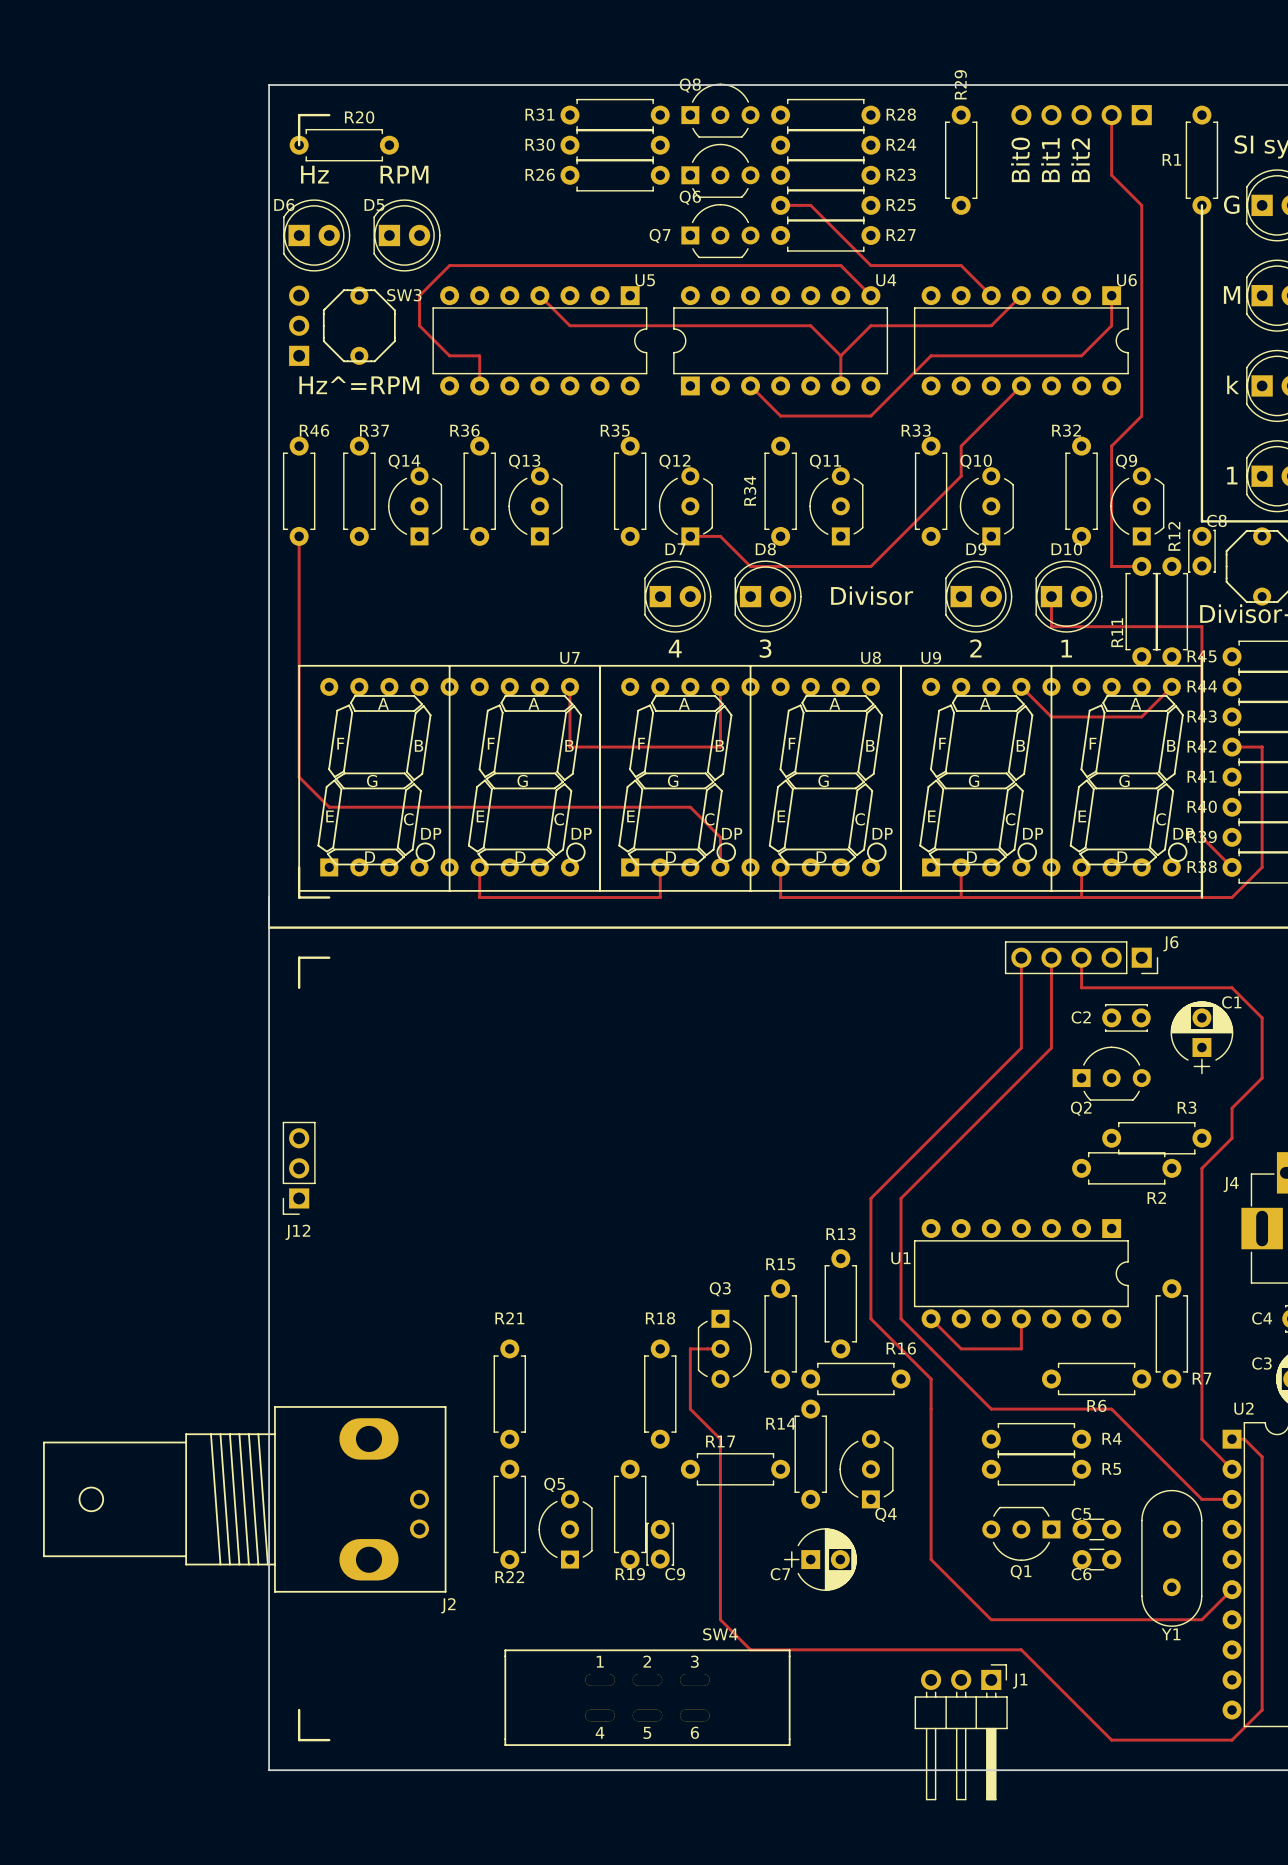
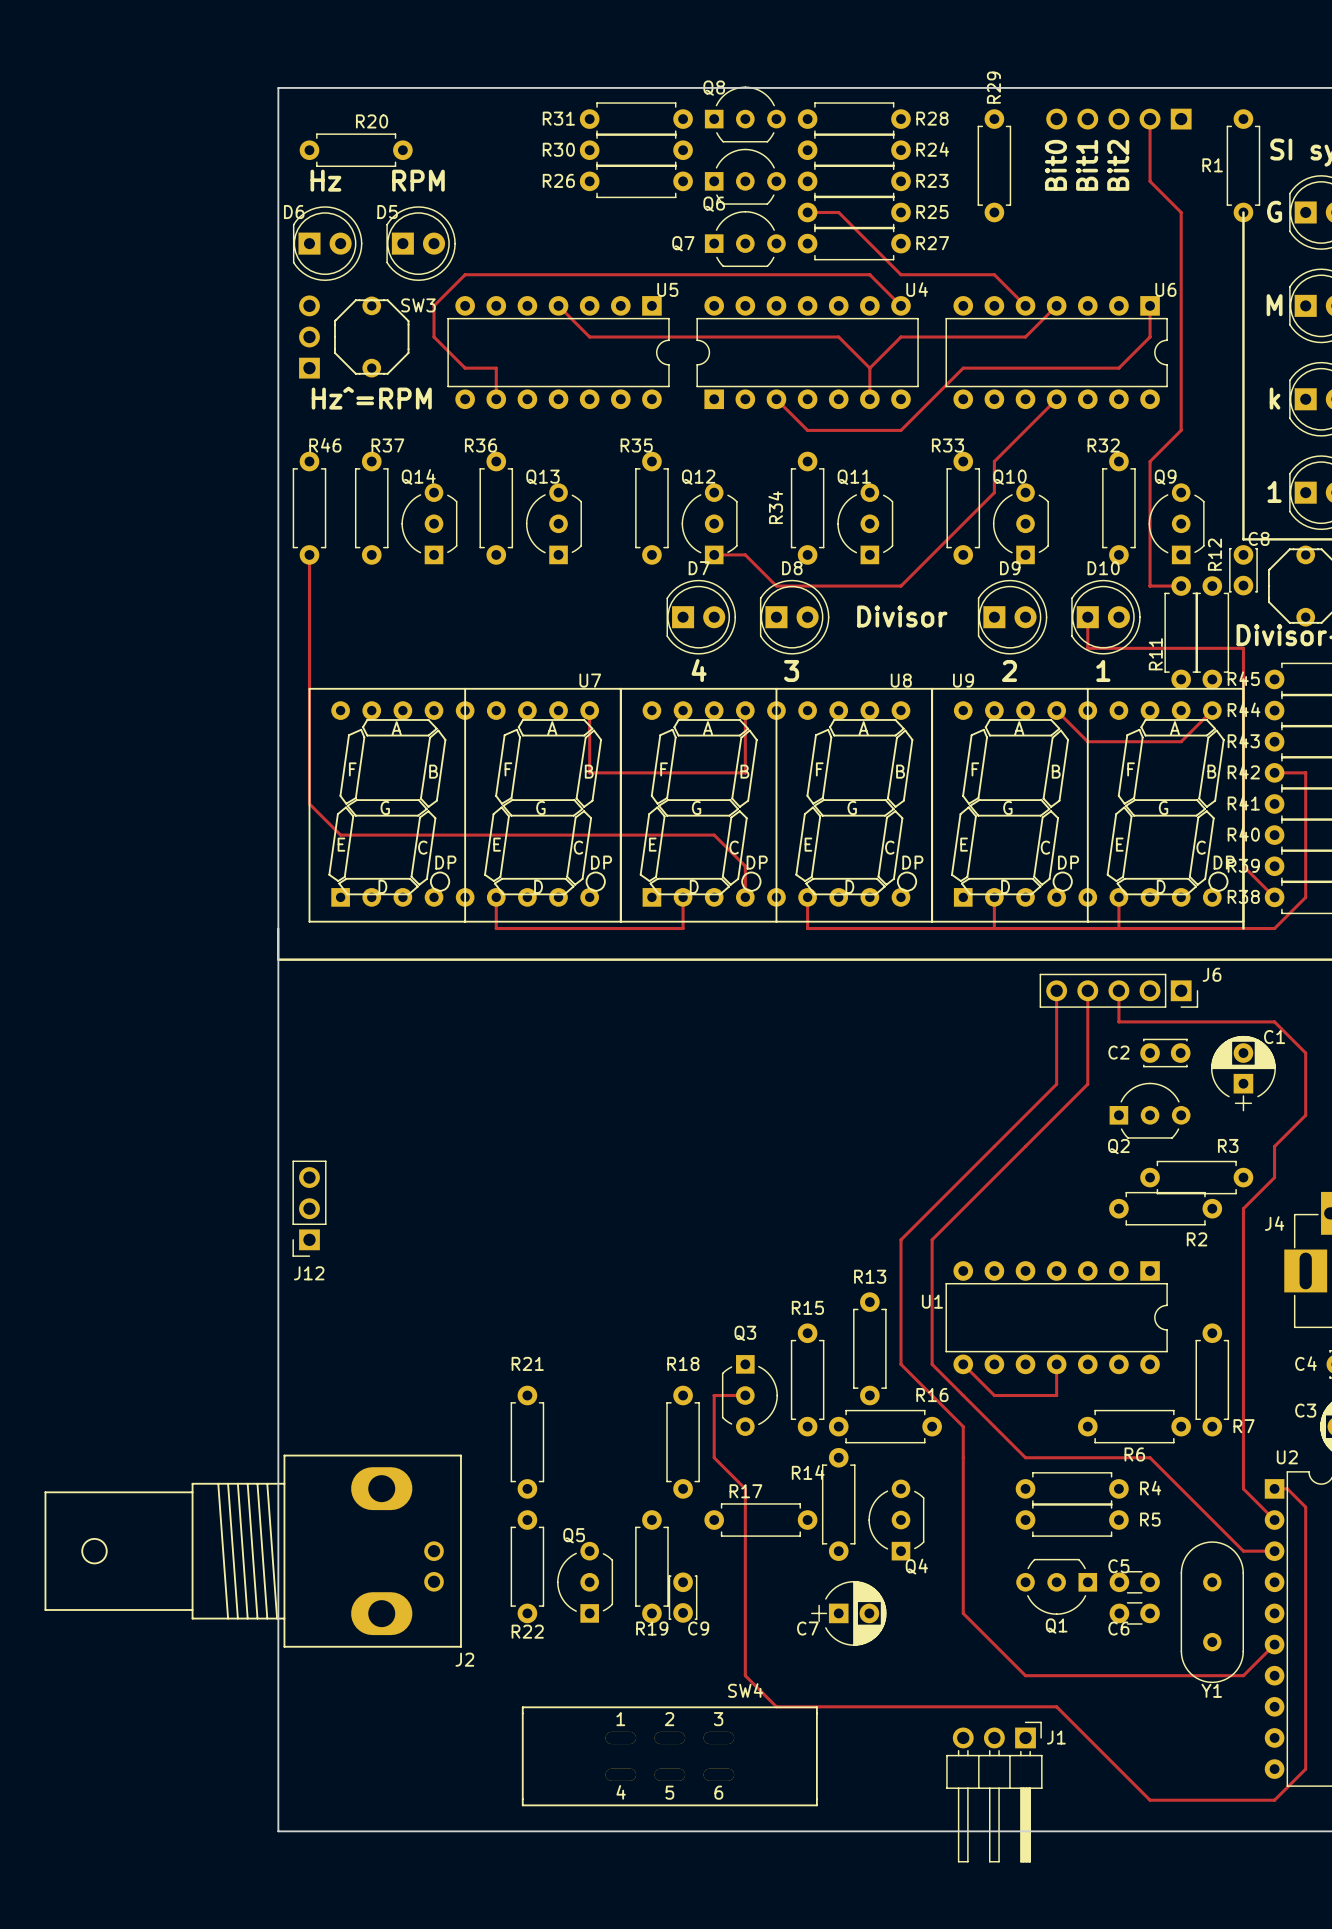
line: (329, 115) (299, 115) (299, 145) -> none
line: (299, 867) (299, 897) (329, 897) -> none
line: (329, 957) (299, 957) (299, 987) -> none
line: (299, 1710) (299, 1740) (329, 1740) -> none

